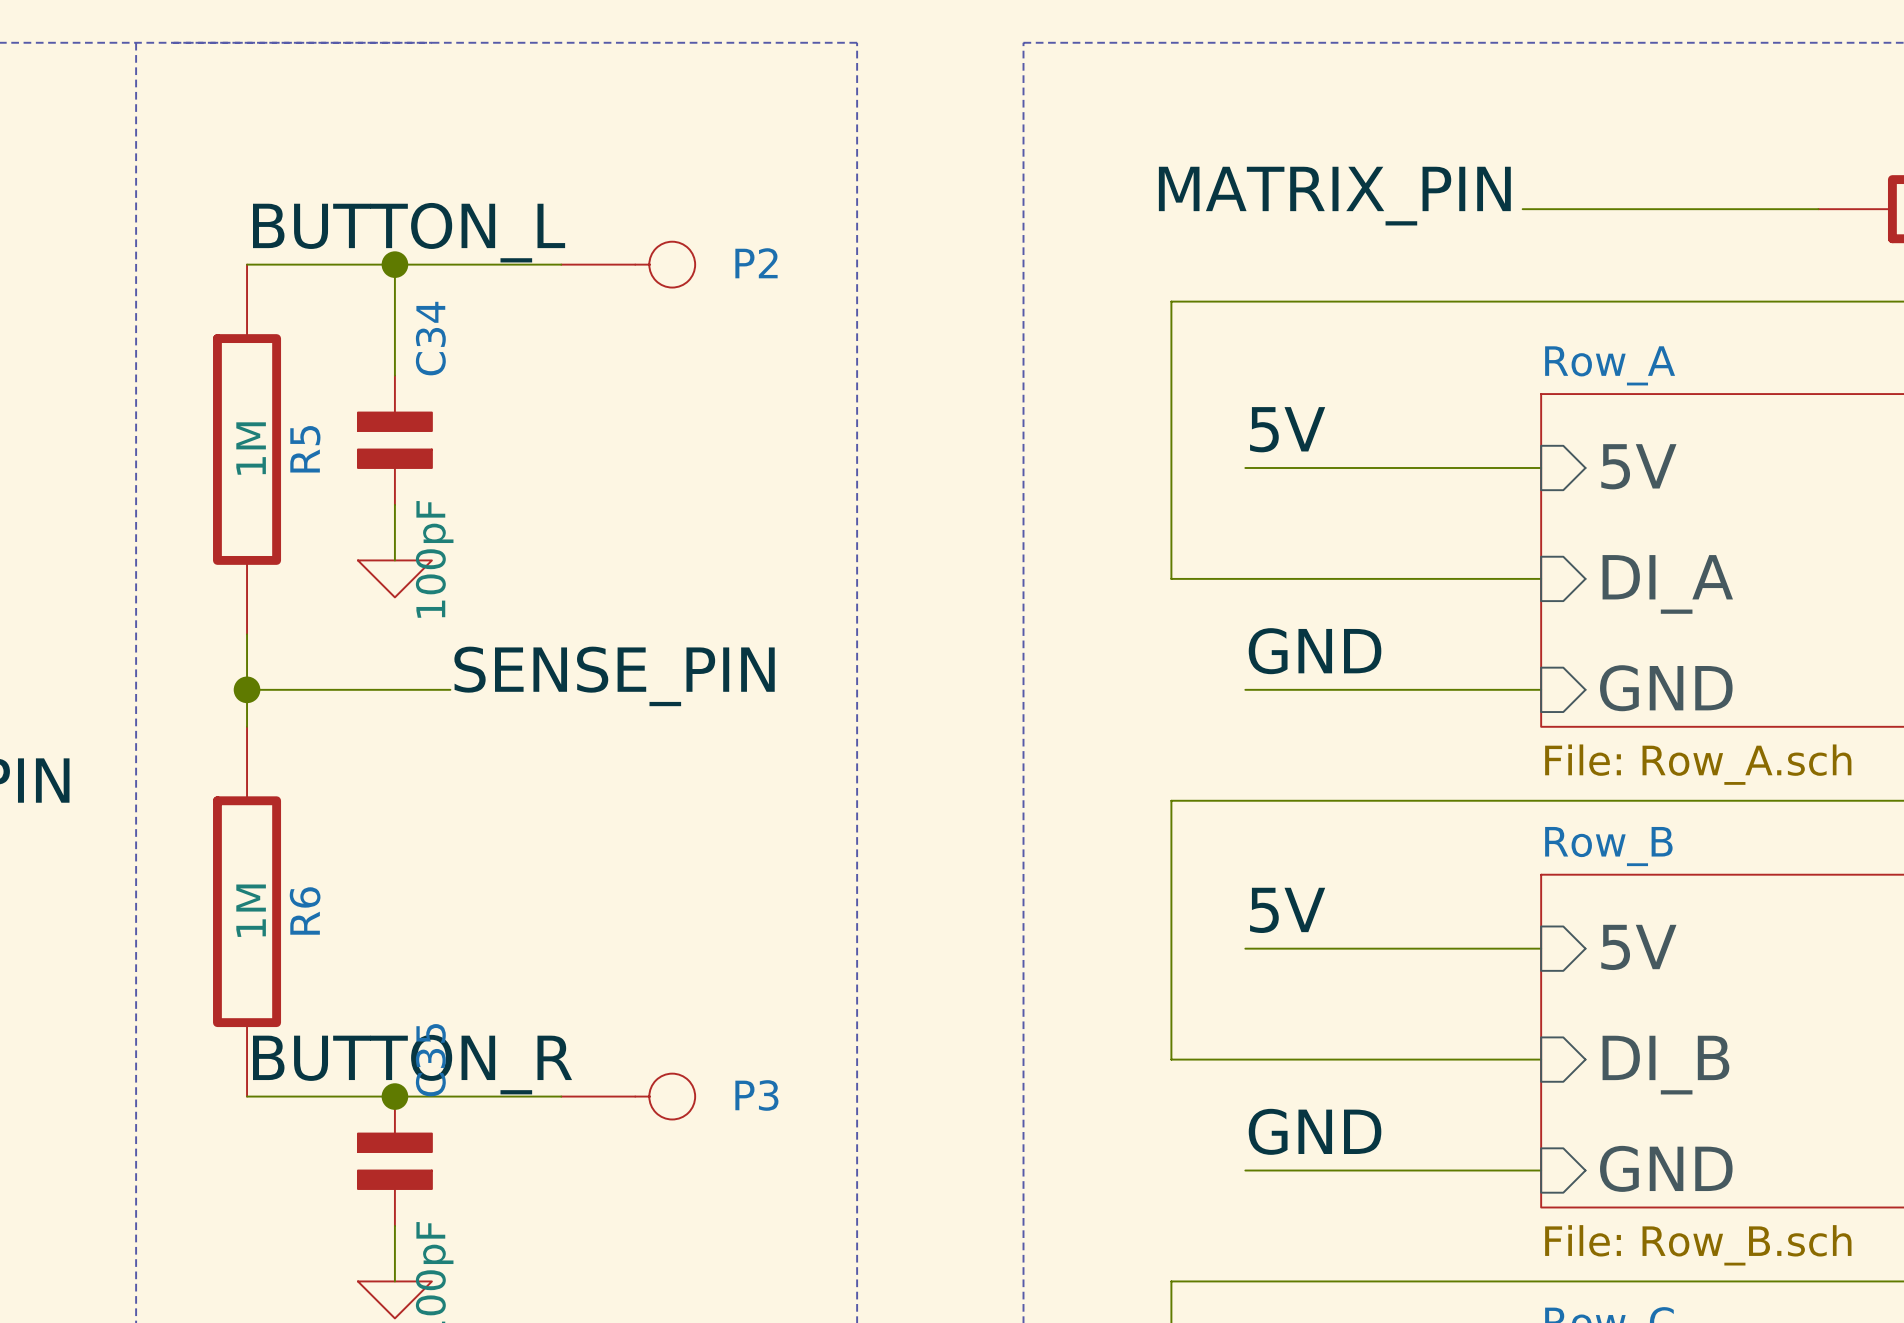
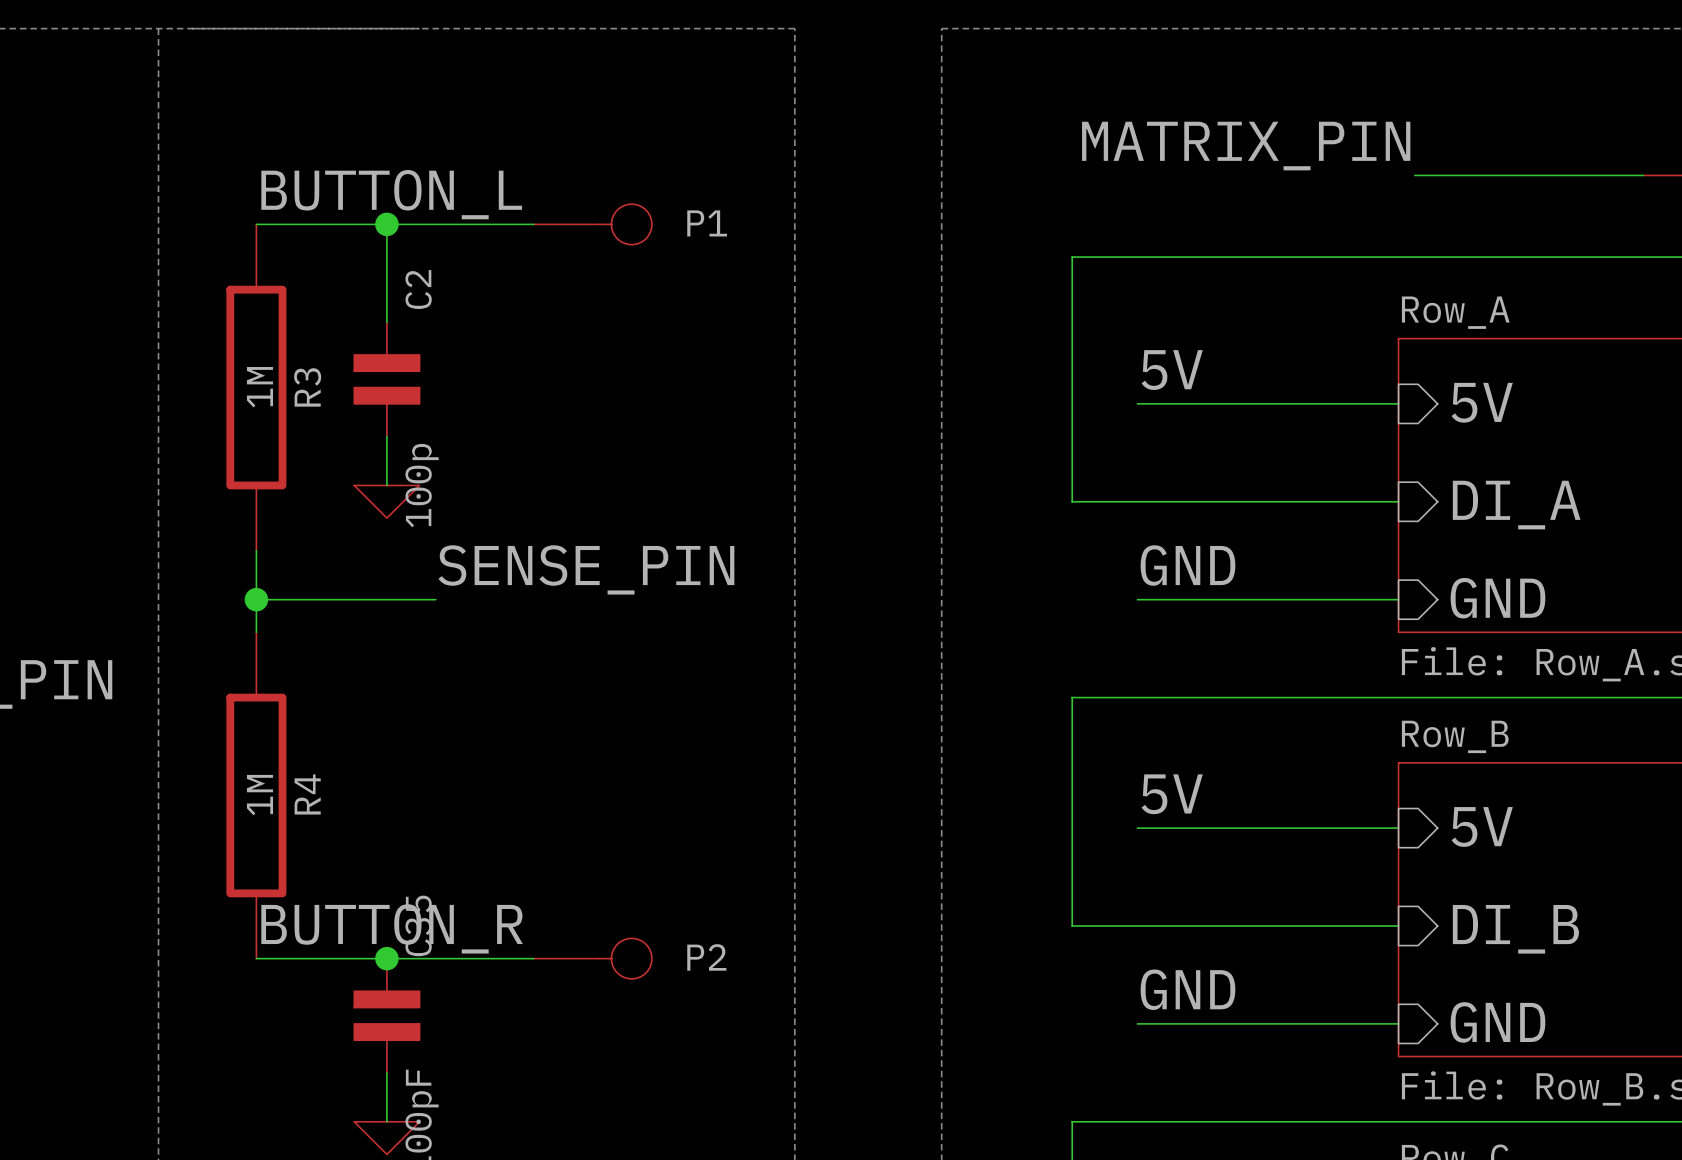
label position: MATRIX_PIN (1334, 196) -> MATRIX_PIN (1246, 146)
wire: (1522, 209) (1559, 209) -> none
P2 name: P2 (756, 263) -> P1 (707, 223)
C34 name: C34 (430, 338) -> C2 (418, 289)
R5 name: R5 (305, 449) -> R3 (307, 387)
C34 value: 100pF (434, 559) -> 100p (422, 485)
label position: SENSE_PIN (614, 676) -> SENSE_PIN (586, 569)
R6 name: R6 (305, 910) -> R4 (307, 794)
P3 name: P3 (756, 1095) -> P2 (706, 957)

